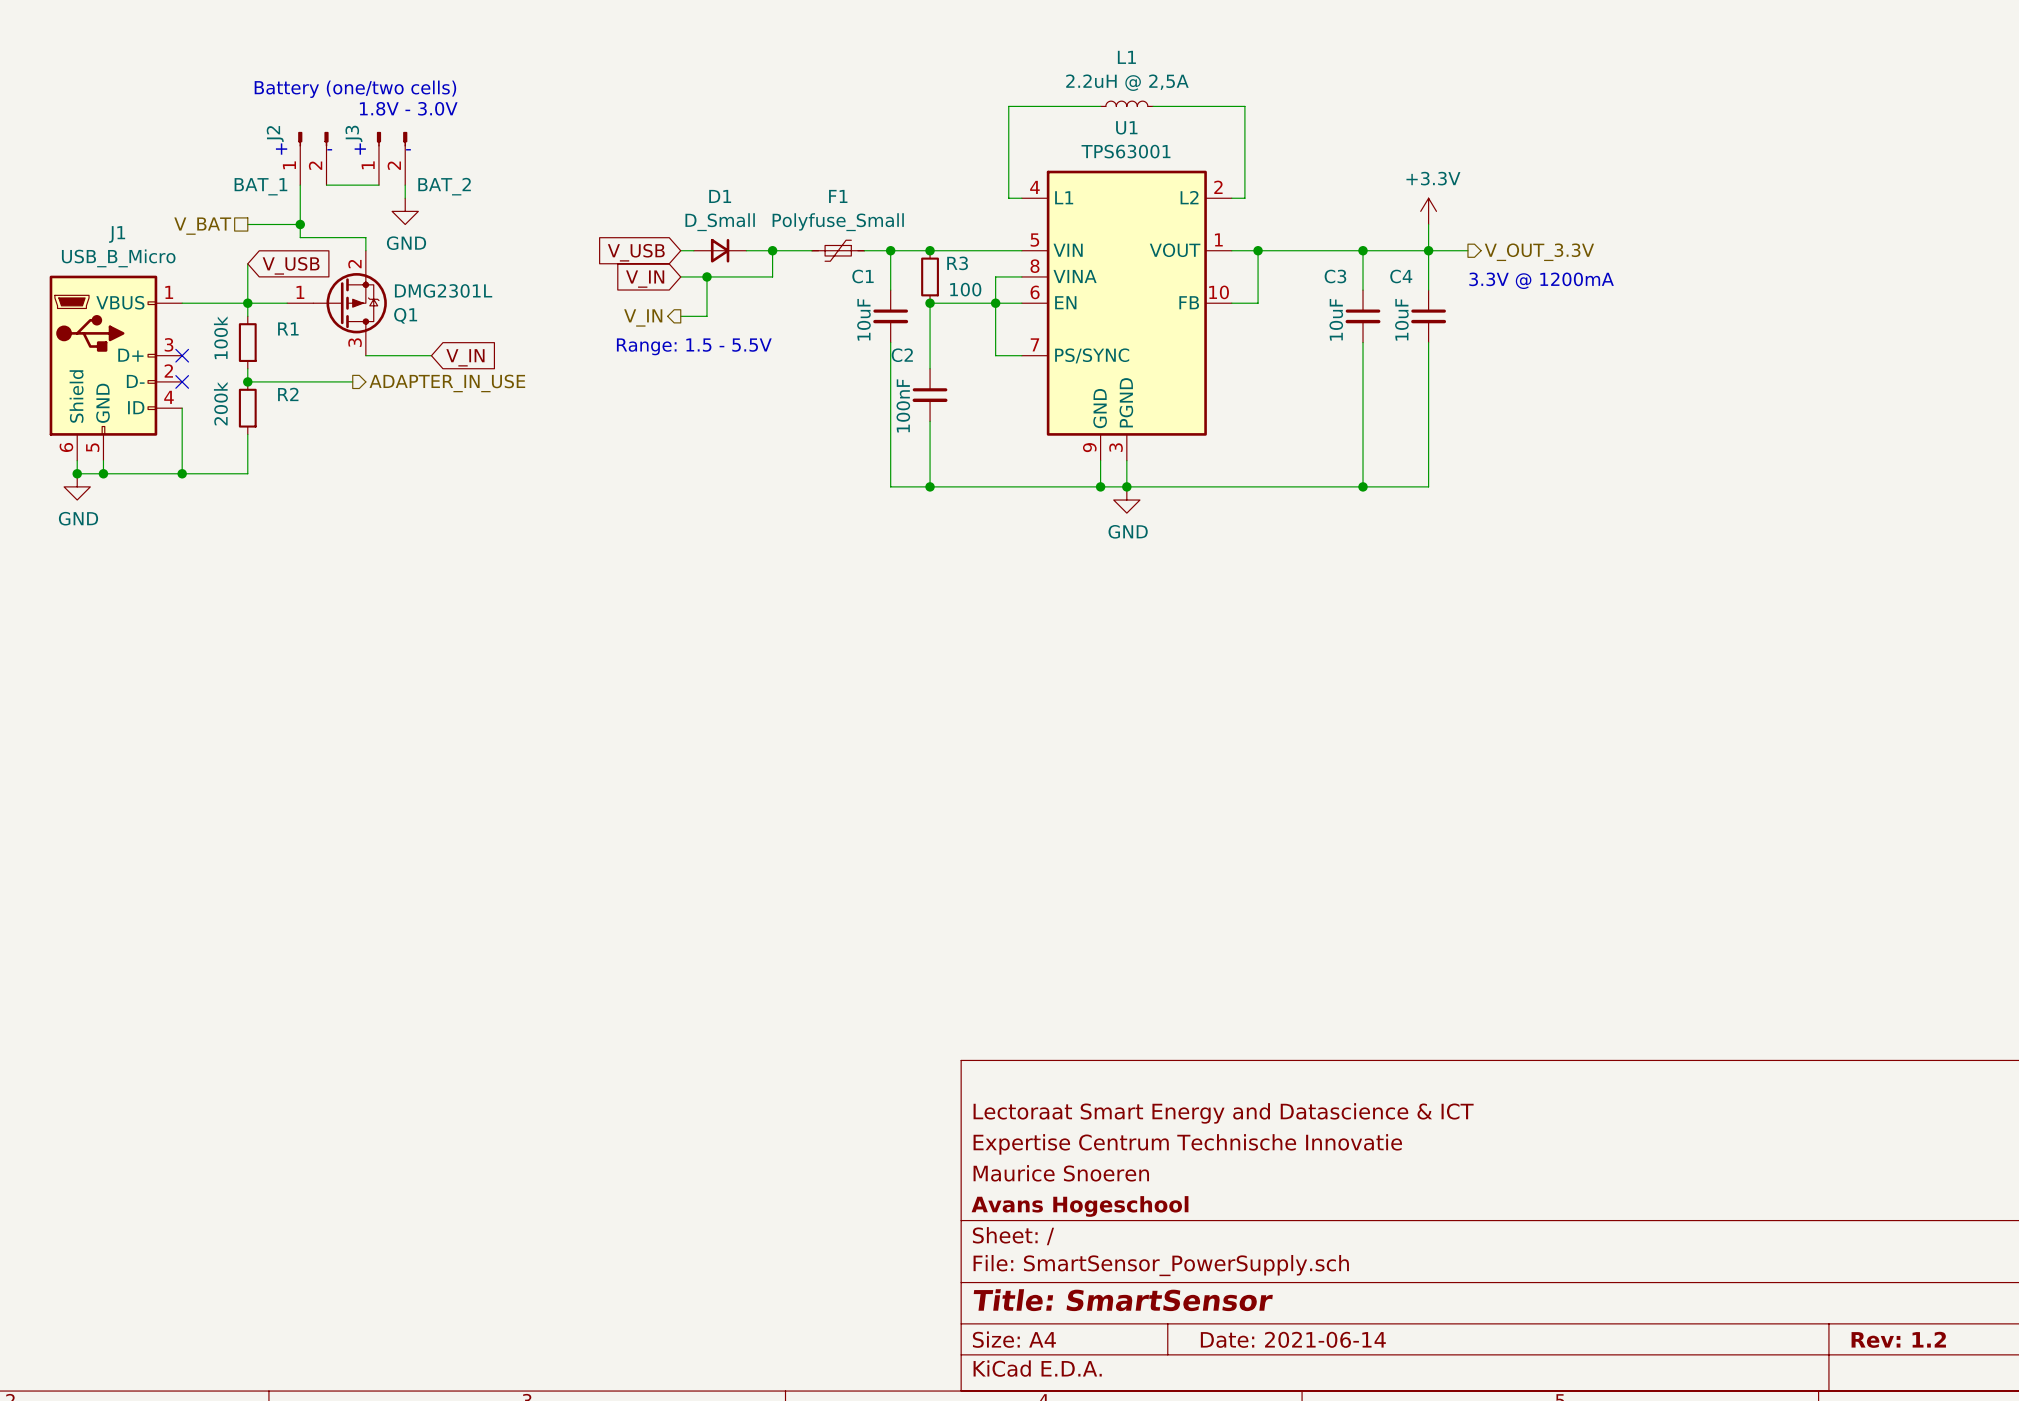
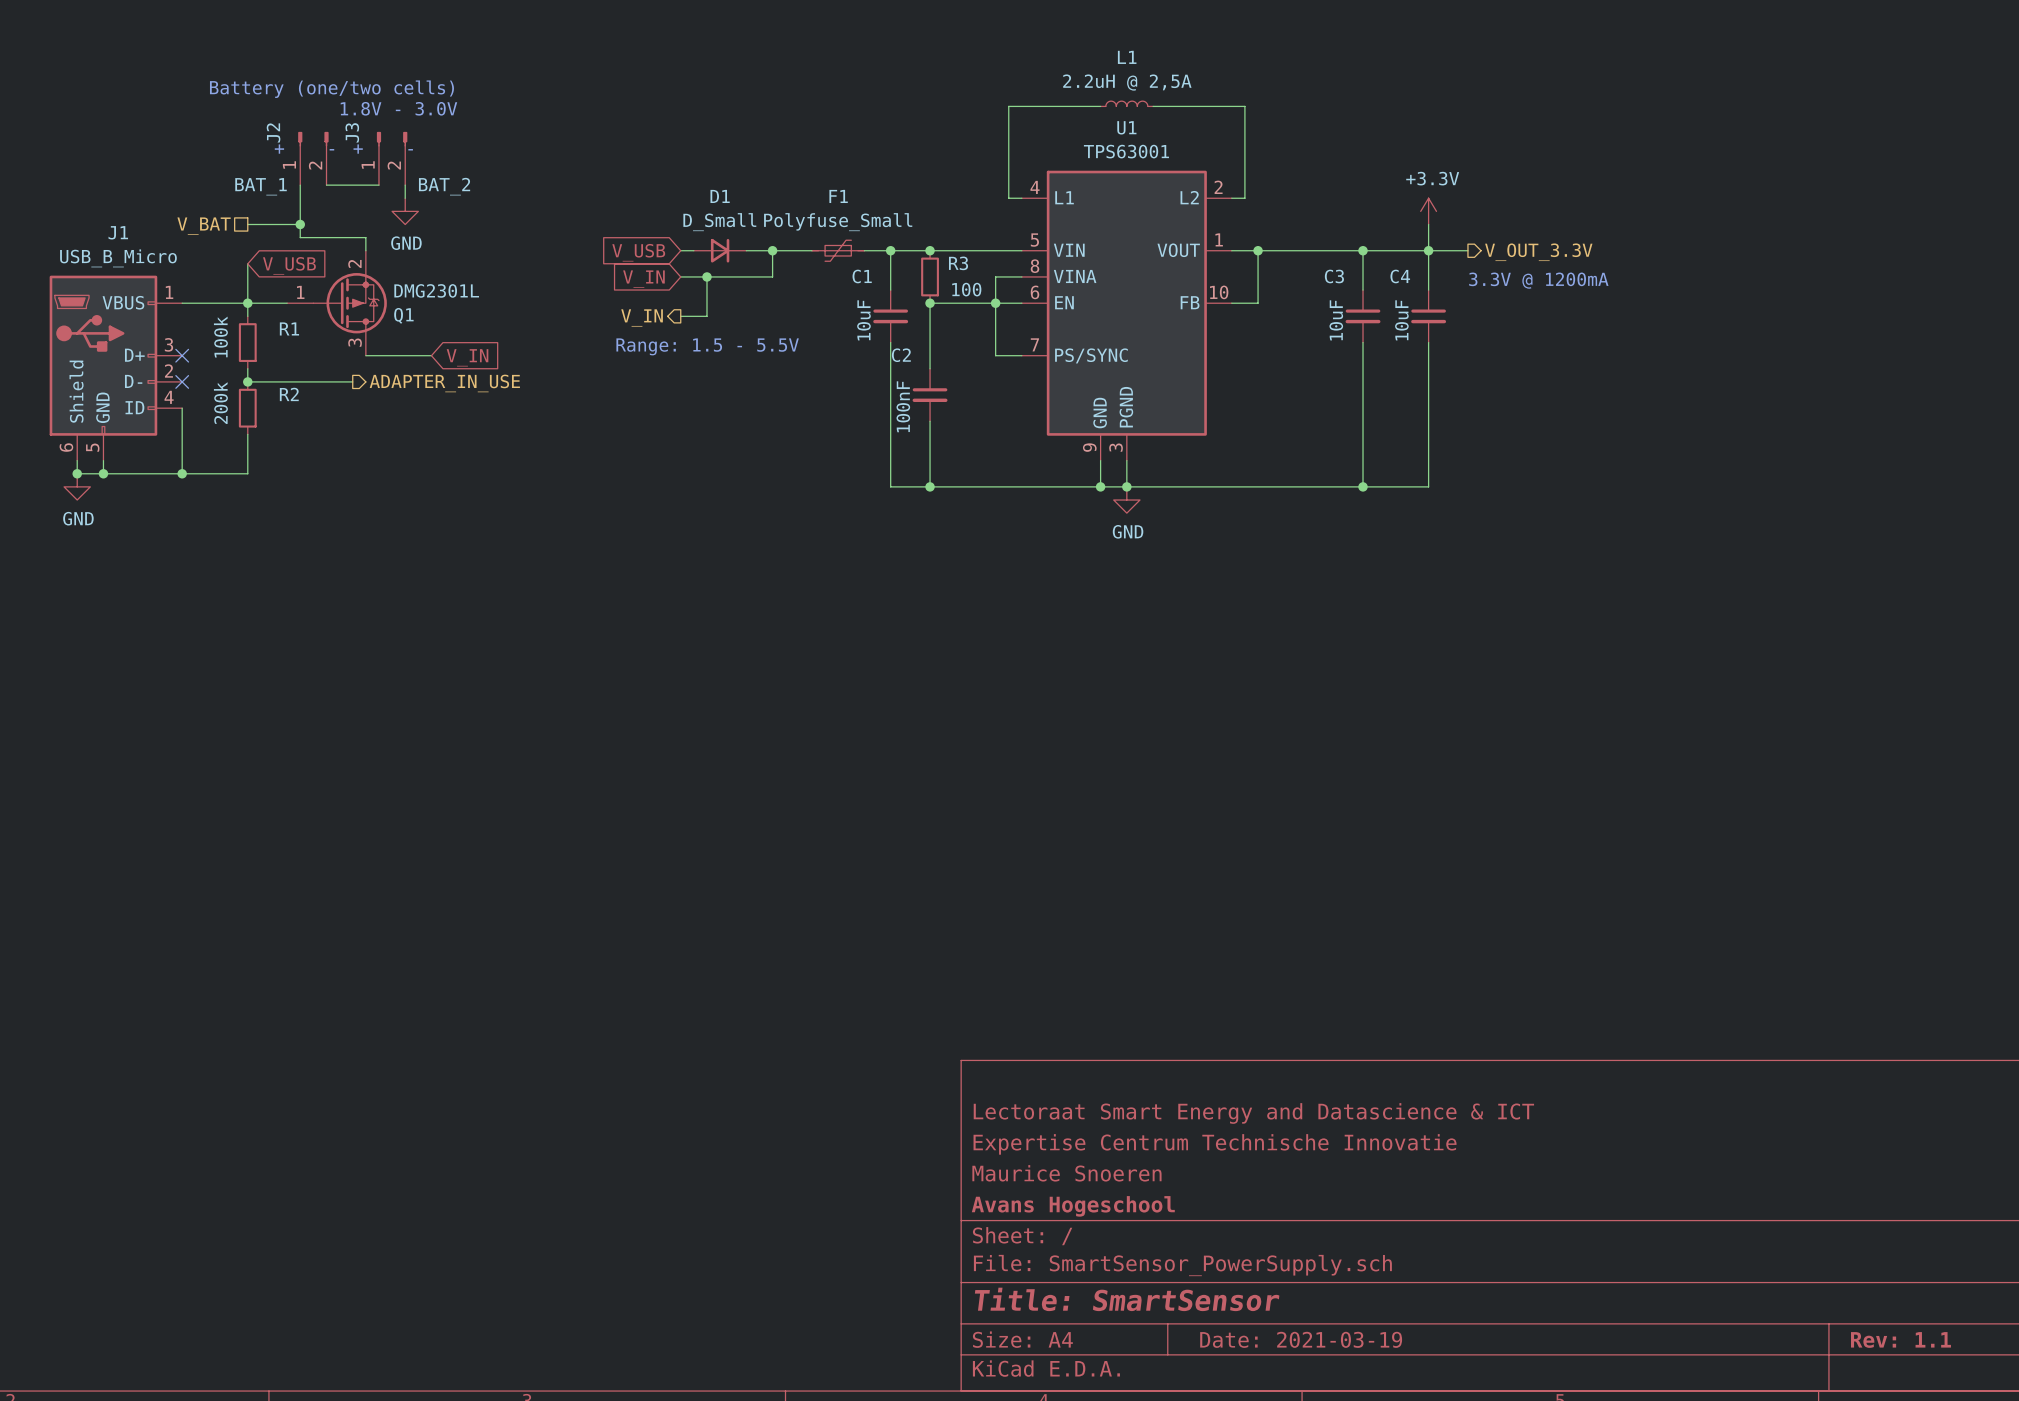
title block: Date: 2021-06-14 (1293, 1339) -> Date: 2021-03-19 (1301, 1339)
title block: Rev: 1.2 (1898, 1339) -> Rev: 1.1 (1900, 1339)

